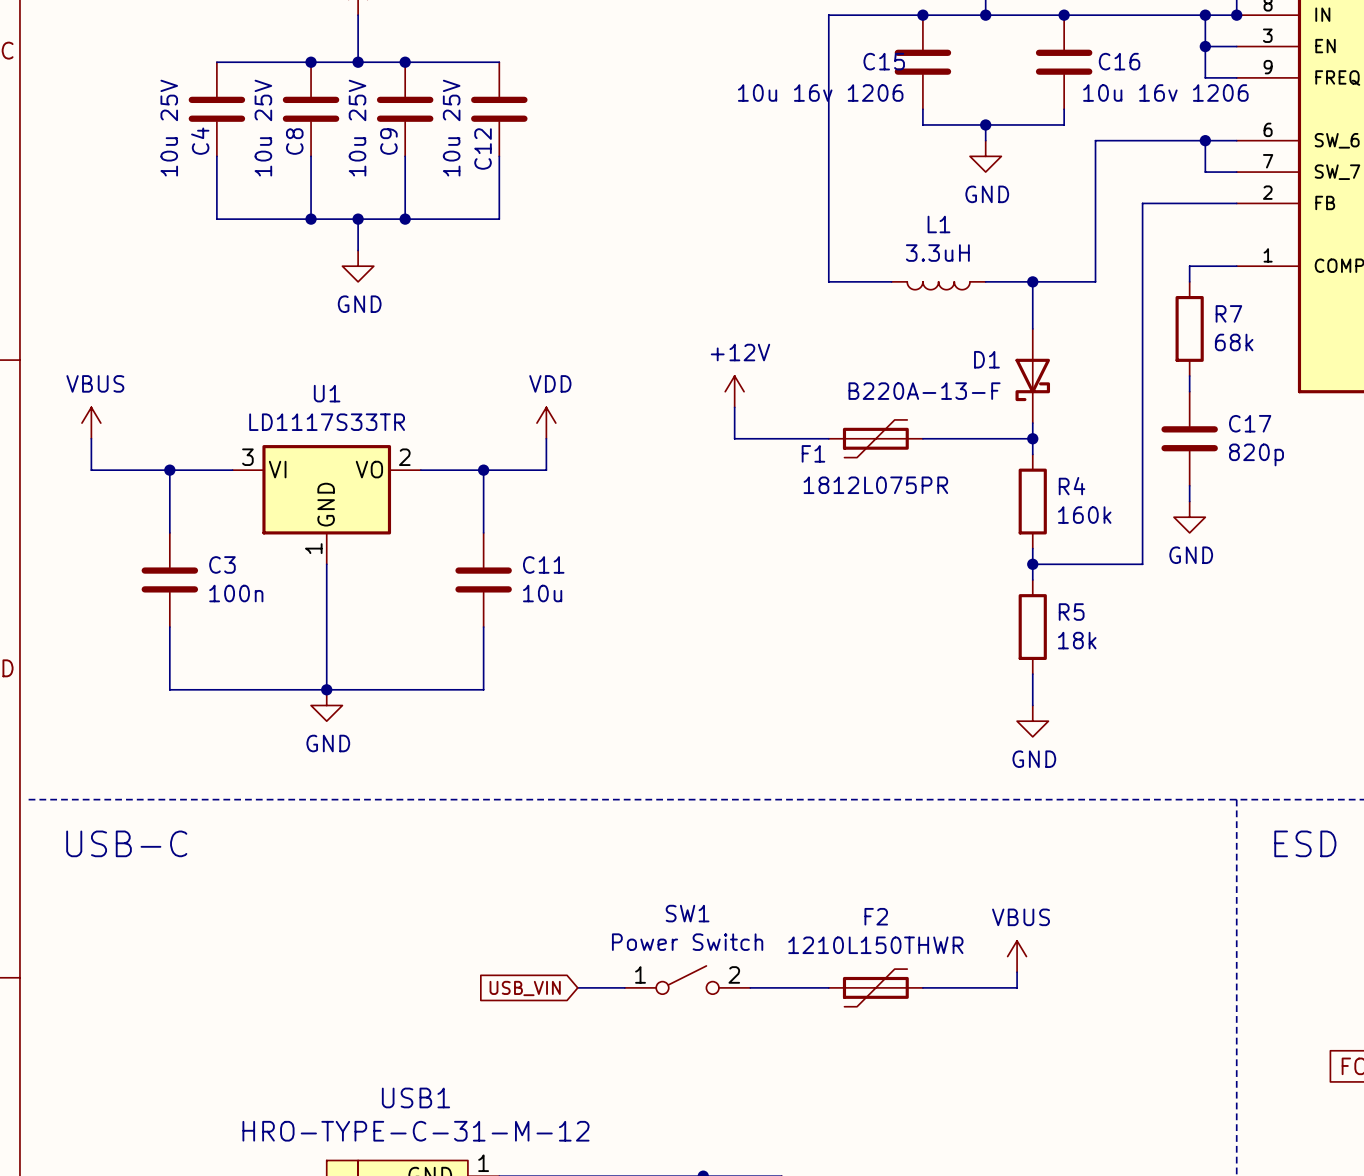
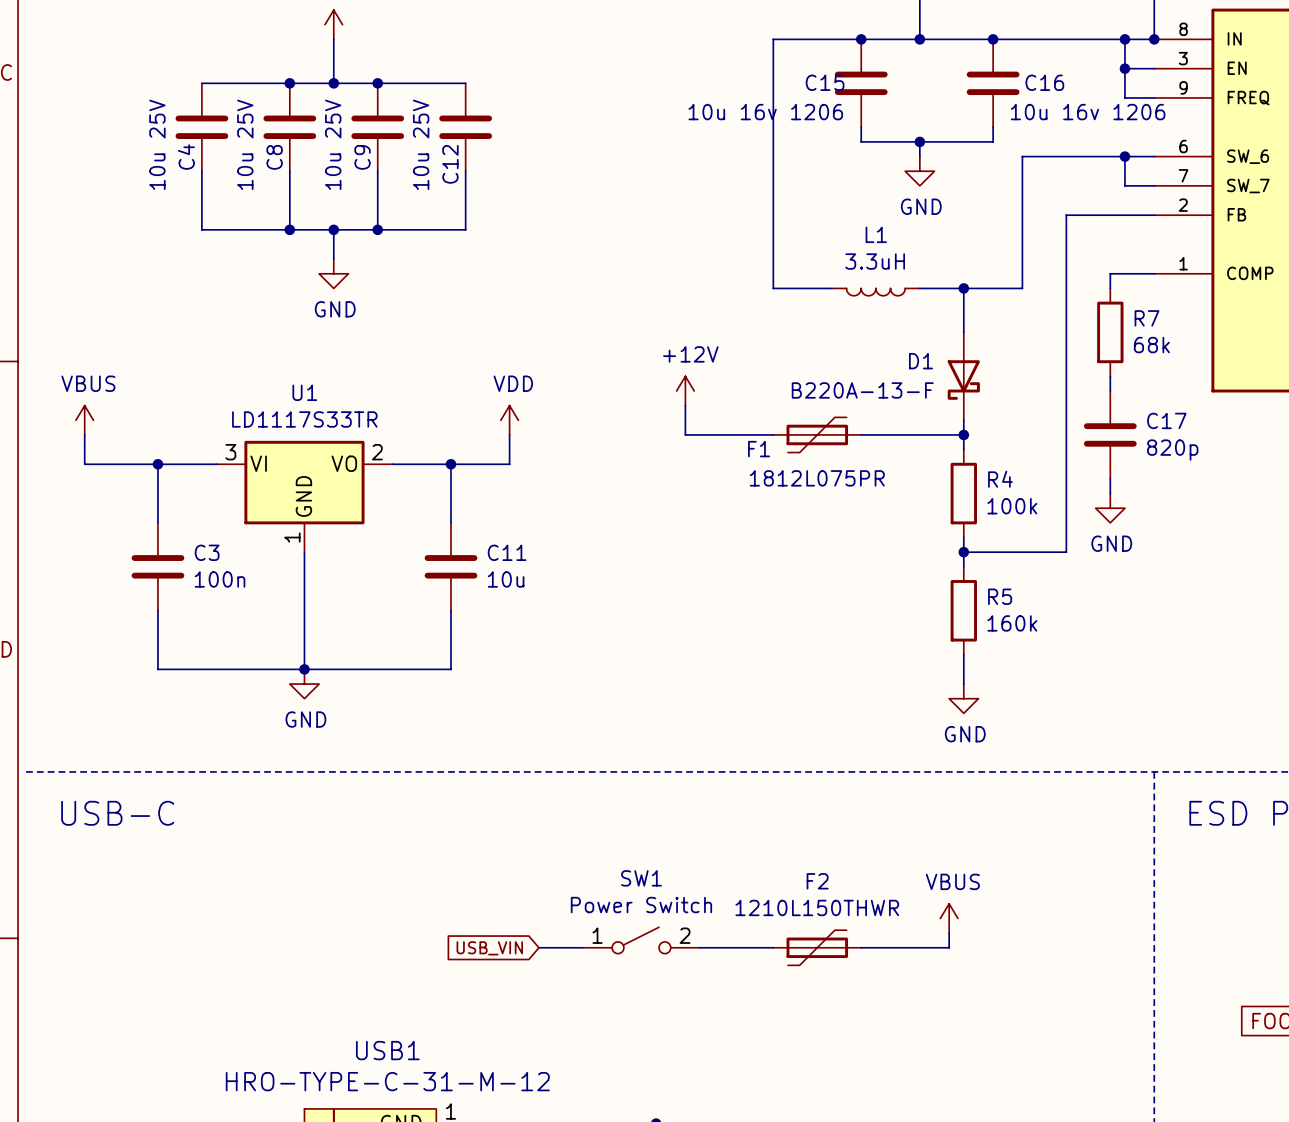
R4 value: 160k (1084, 515) -> 100k (1012, 506)
R5 value: 18k (1077, 640) -> 160k (1012, 623)

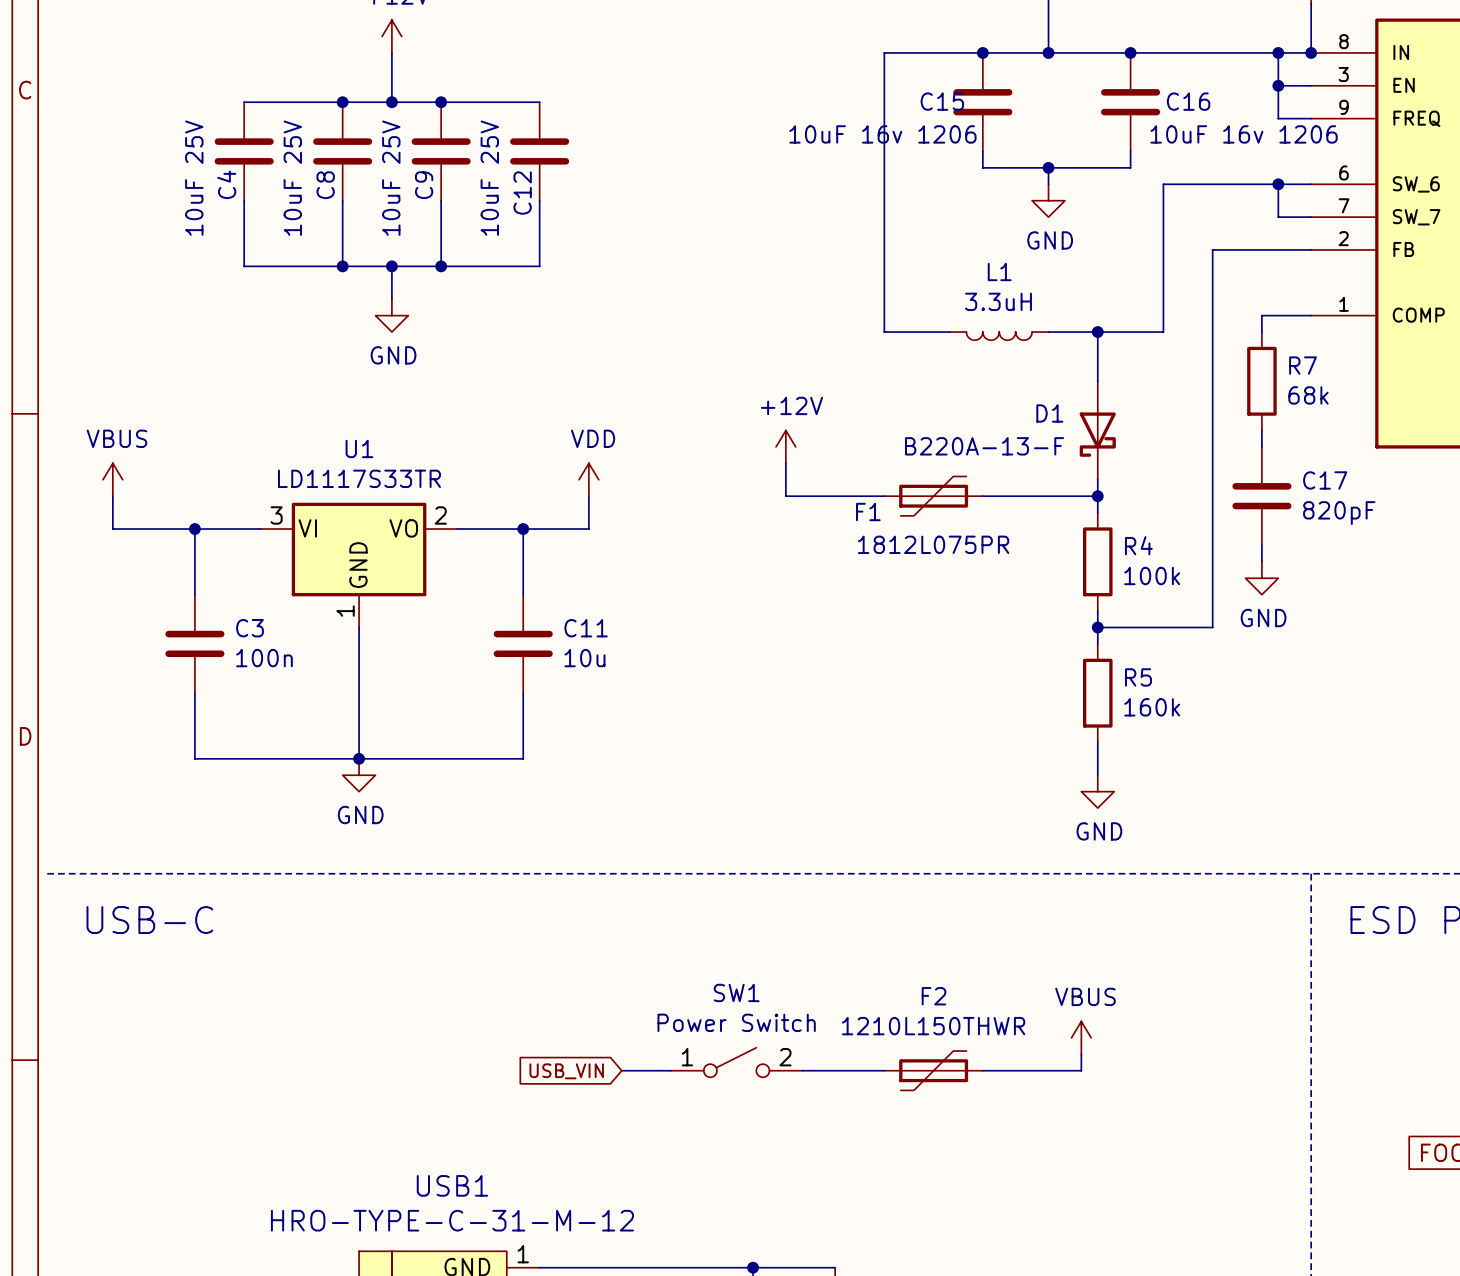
C15 value: 10u 16v 1206 (765, 112) -> 10uF 16v 1206 (882, 134)
C16 value: 10u 16v 1206 (1088, 112) -> 10uF 16v 1206 (1244, 134)
C4 value: 10u 25V (157, 144) -> 10uF 25V (194, 178)
C8 value: 10u 25V (245, 144) -> 10uF 25V (292, 178)
C9 value: 10u 25V (333, 144) -> 10uF 25V (391, 178)
C12 value: 10u 25V (421, 144) -> 10uF 25V (489, 178)
C17 value: 820p (1172, 450) -> 820pF (1339, 513)

